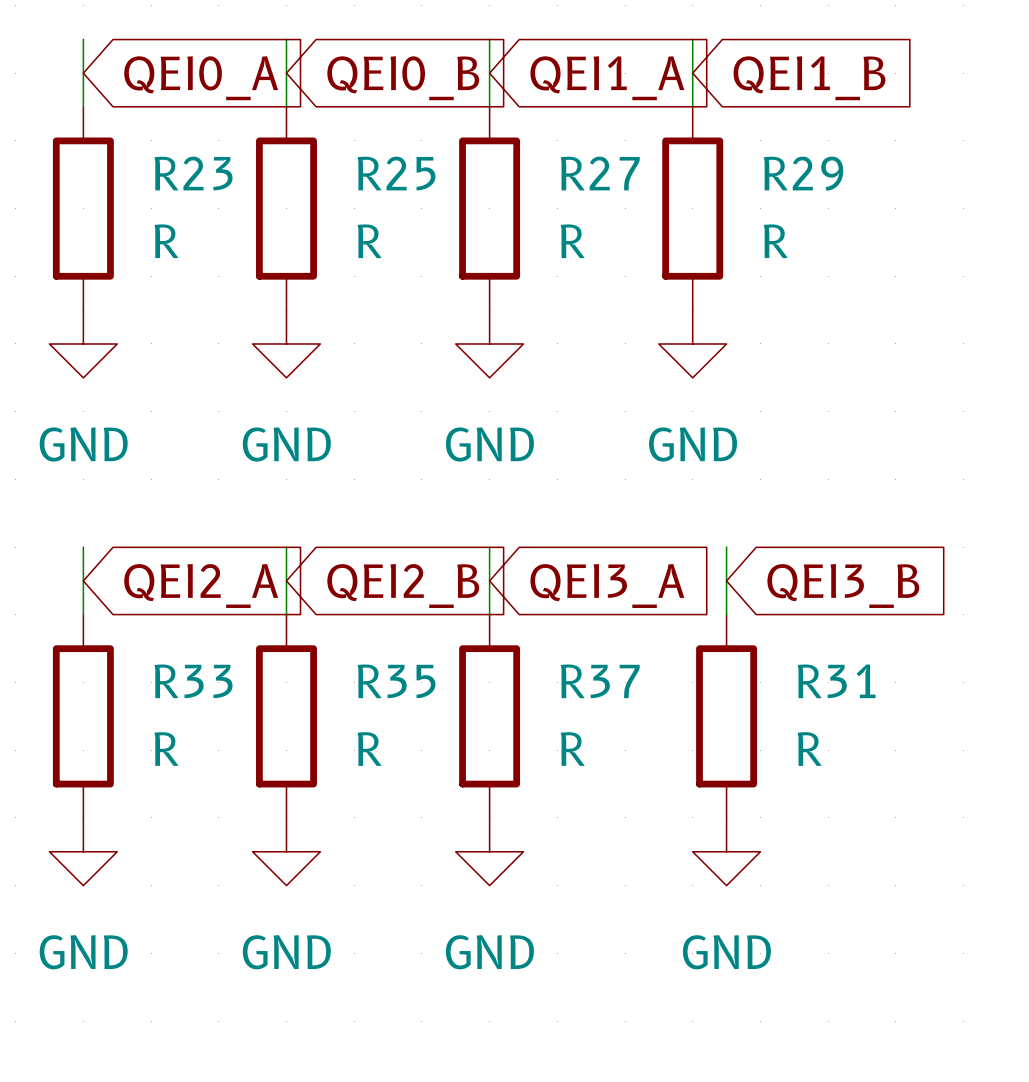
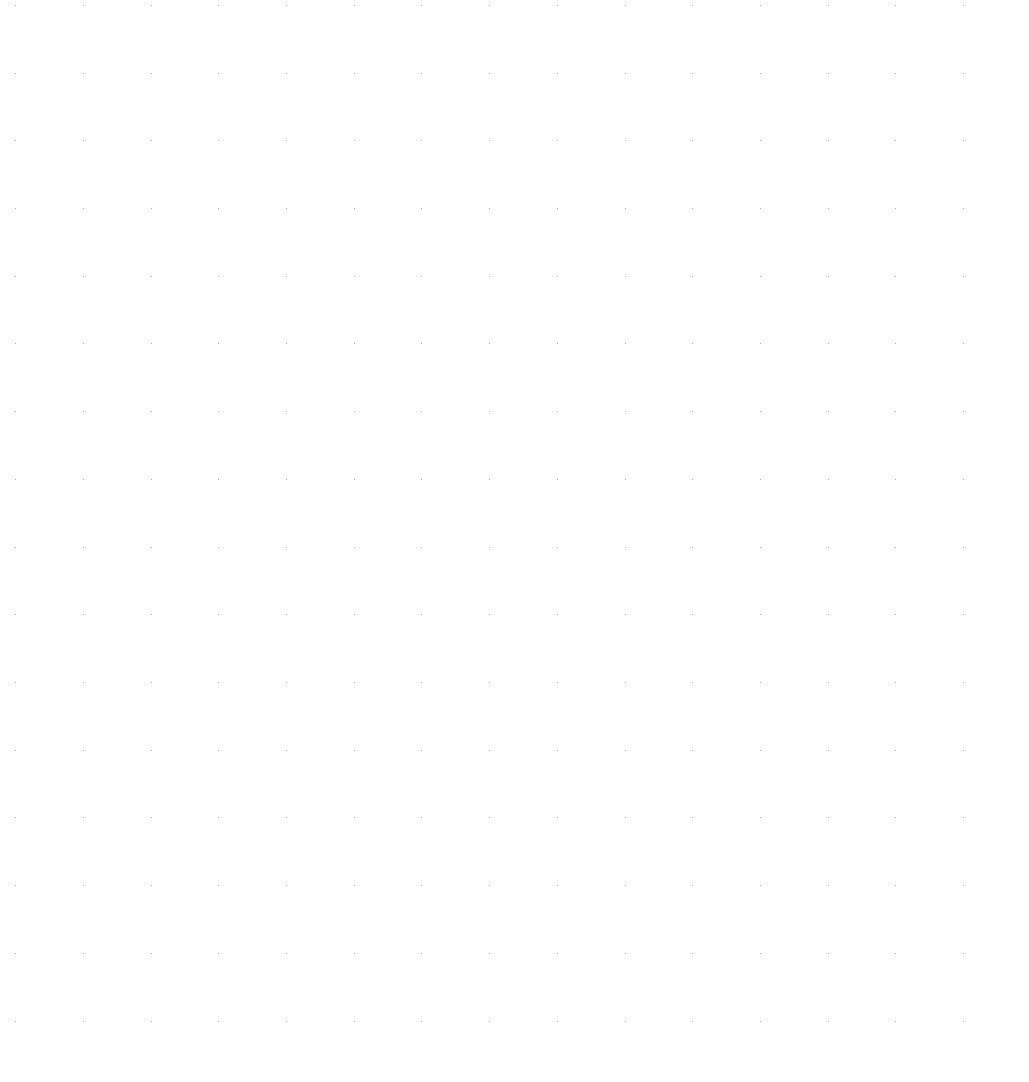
wire: (83, 39) (83, 107) -> none
wire: (286, 39) (286, 107) -> none
wire: (489, 39) (489, 107) -> none
wire: (692, 39) (692, 107) -> none
global label: QEI0_A (201, 78) -> none
global label: QEI0_B (403, 78) -> none
global label: QEI1_A (607, 78) -> none
global label: QEI1_B (809, 78) -> none
R23: R (83, 208) -> none
R25: R (286, 208) -> none
R27: R (489, 208) -> none
R29: R (692, 208) -> none
power symbol: GND (83, 343) -> none
power symbol: GND (286, 343) -> none
power symbol: GND (489, 343) -> none
power symbol: GND (692, 343) -> none
wire: (83, 547) (83, 614) -> none
wire: (286, 547) (286, 614) -> none
wire: (489, 547) (489, 614) -> none
wire: (726, 547) (726, 614) -> none
global label: QEI2_A (201, 586) -> none
global label: QEI2_B (403, 586) -> none
global label: QEI3_A (607, 586) -> none
global label: QEI3_B (843, 586) -> none
R33: R (83, 716) -> none
R35: R (286, 716) -> none
R37: R (489, 716) -> none
R31: R (726, 716) -> none
power symbol: GND (83, 851) -> none
power symbol: GND (286, 851) -> none
power symbol: GND (489, 851) -> none
power symbol: GND (726, 851) -> none

